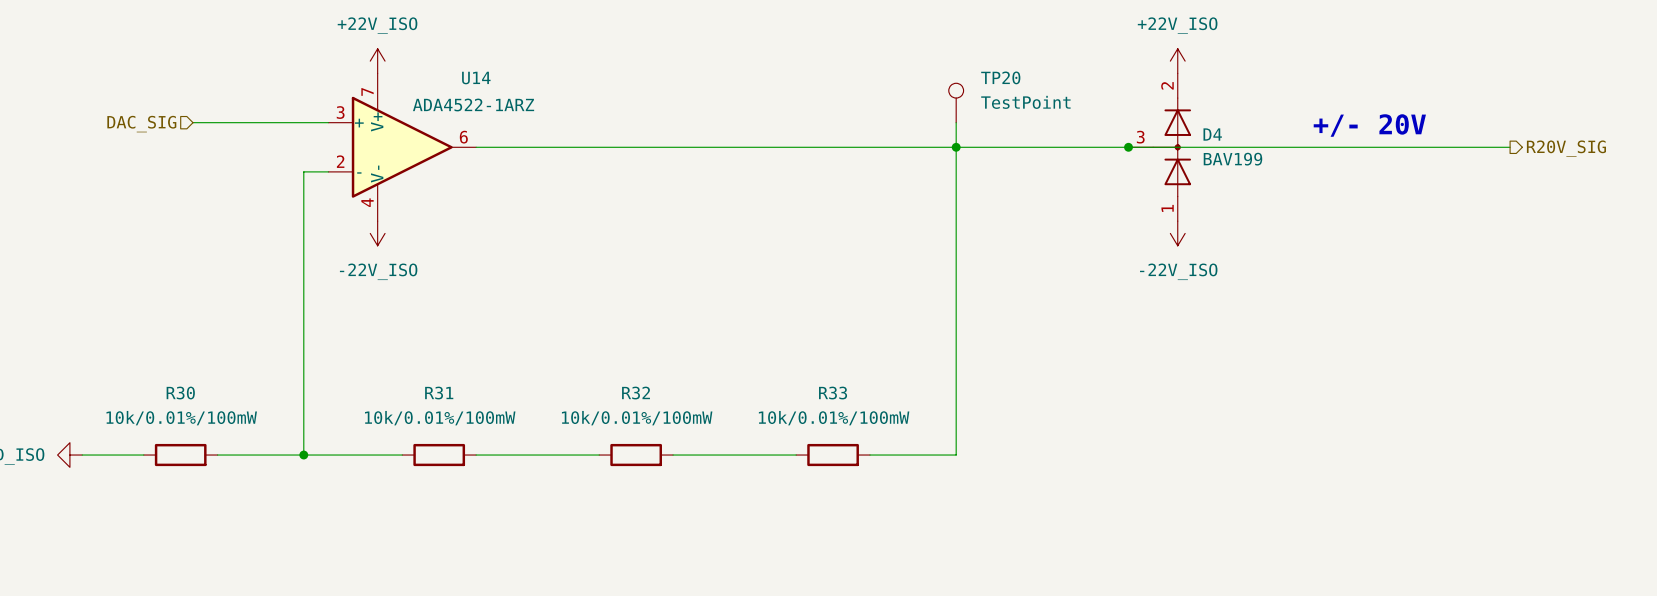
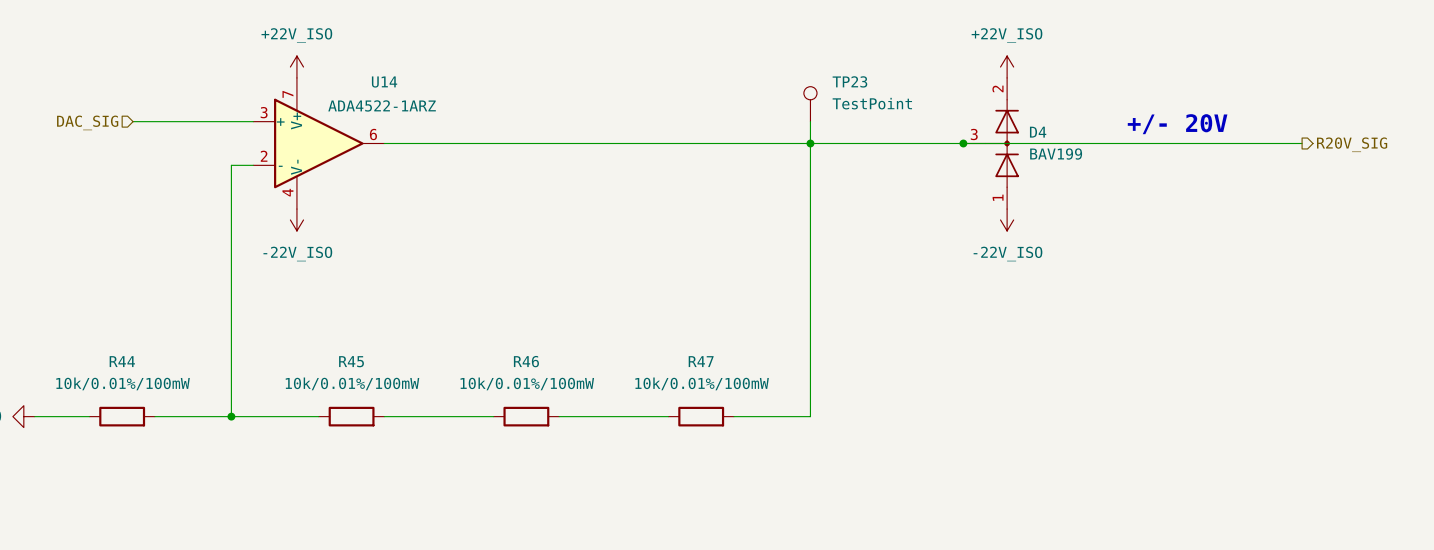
TP20 name: TP20 (1000, 77) -> TP23 (849, 81)
R30 name: R30 (180, 393) -> R44 (122, 361)
R31 name: R31 (439, 393) -> R45 (351, 361)
R32 name: R32 (636, 393) -> R46 (526, 361)
R33 name: R33 (833, 393) -> R47 (701, 361)

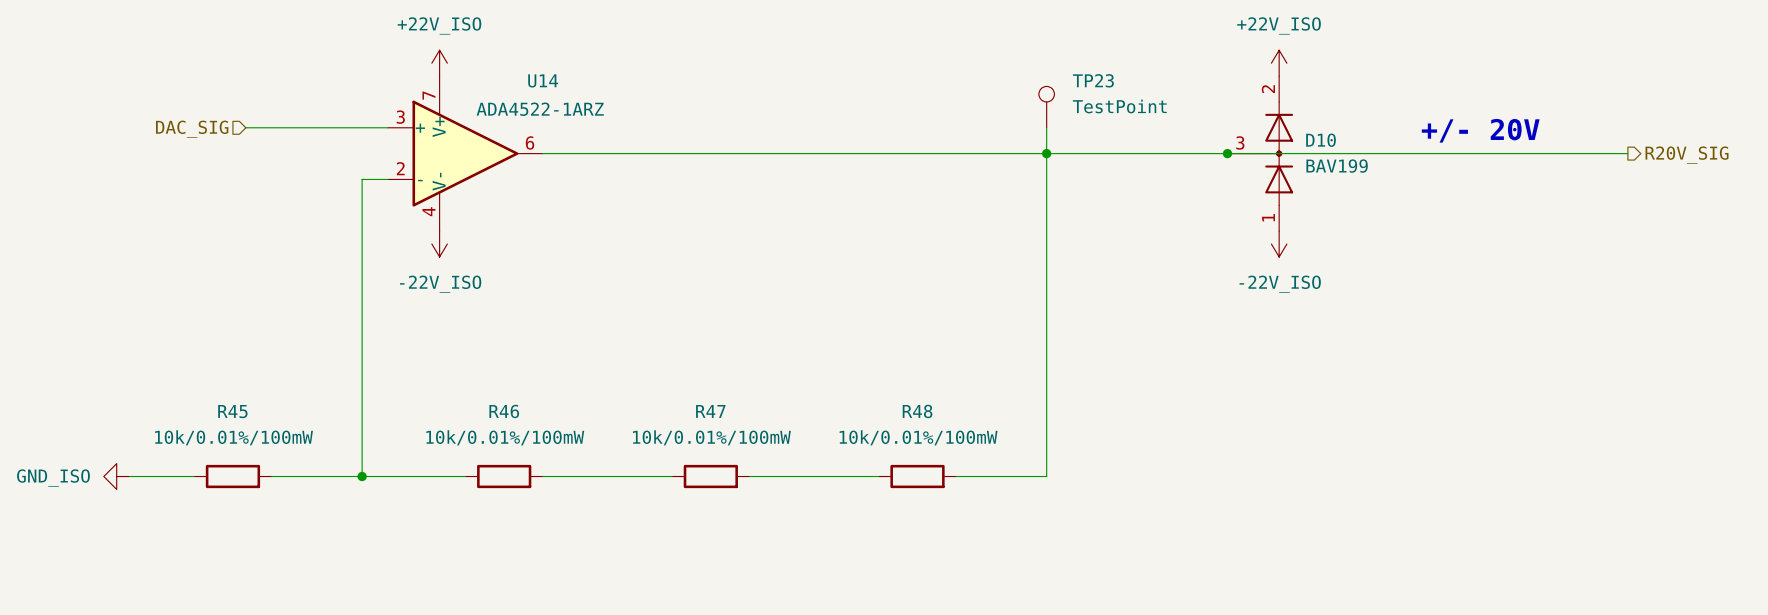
D4 name: D4 (1038, 132) -> D10 (1321, 140)
R44 name: R44 (122, 361) -> R45 (232, 411)
R45 name: R45 (351, 361) -> R46 (504, 411)
R46 name: R46 (526, 361) -> R47 (710, 411)
R47 name: R47 (701, 361) -> R48 (917, 411)

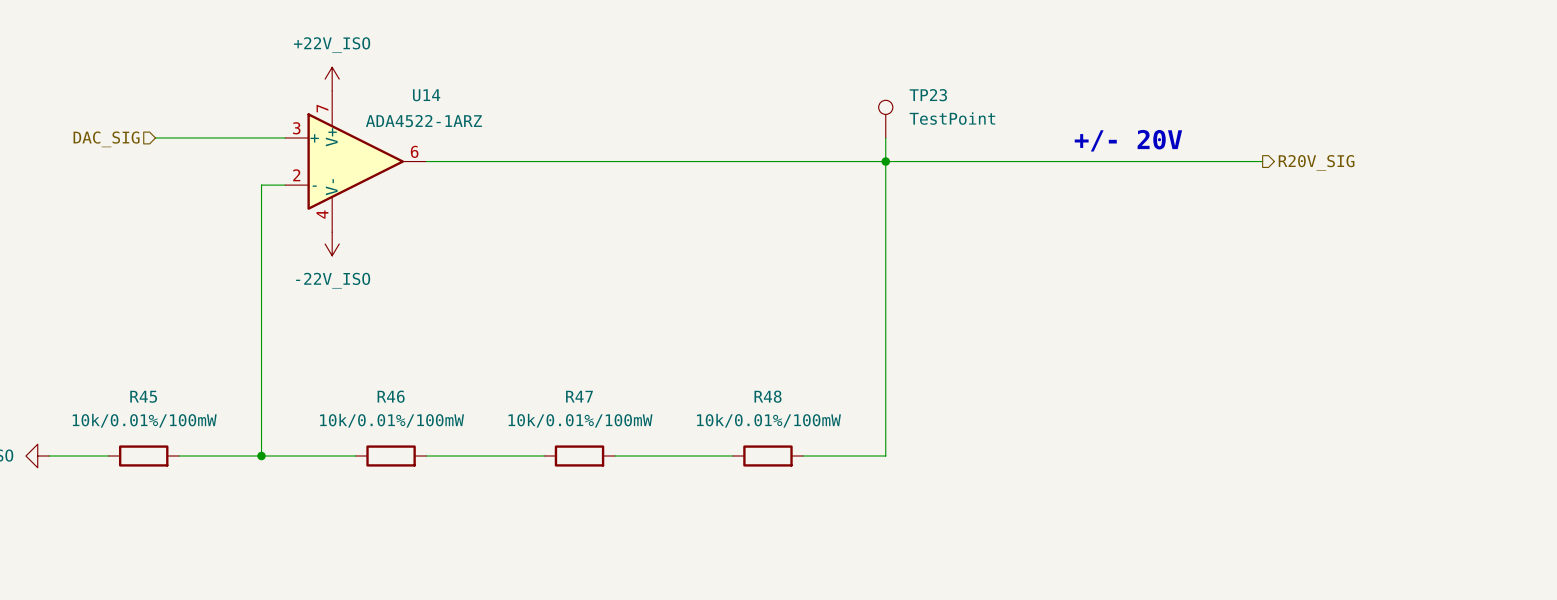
power symbol: +22V_ISO (1279, 63) -> none
text position: +/- 20V (1480, 130) -> +/- 20V (1128, 140)
junction: (1227, 153) -> none
D10: BAV199 (1260, 153) -> none
wire: (1459, 153) (1627, 153) -> none
hierarchical label position: R20V_SIG (1687, 155) -> R20V_SIG (1316, 162)
power symbol: -22V_ISO (1279, 244) -> none

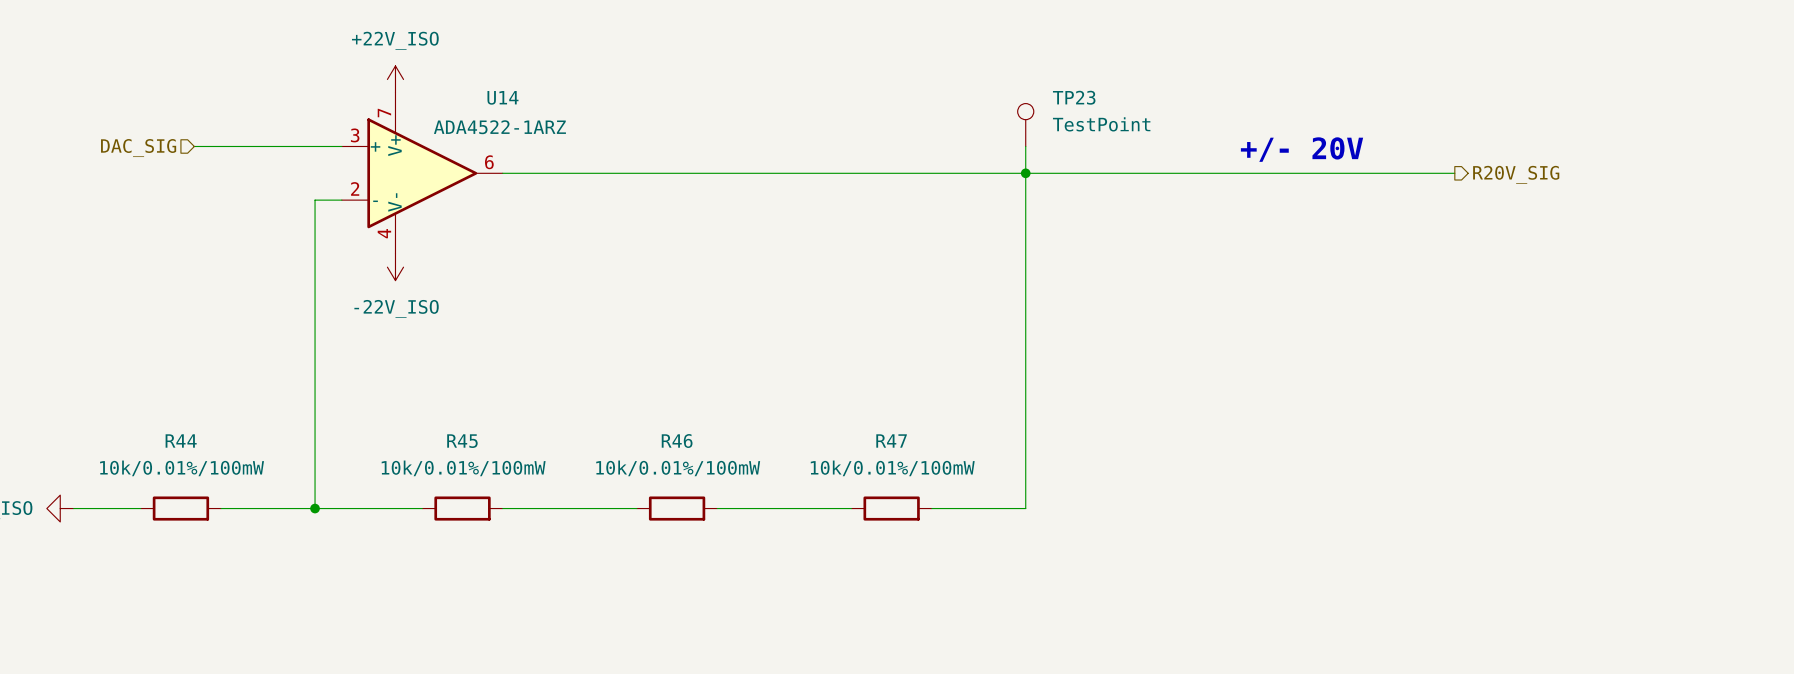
R45 name: R45 (143, 396) -> R44 (181, 440)
R46 name: R46 (391, 396) -> R45 (462, 441)
R47 name: R47 (579, 396) -> R46 (677, 441)
R48 name: R48 (768, 396) -> R47 (891, 440)

